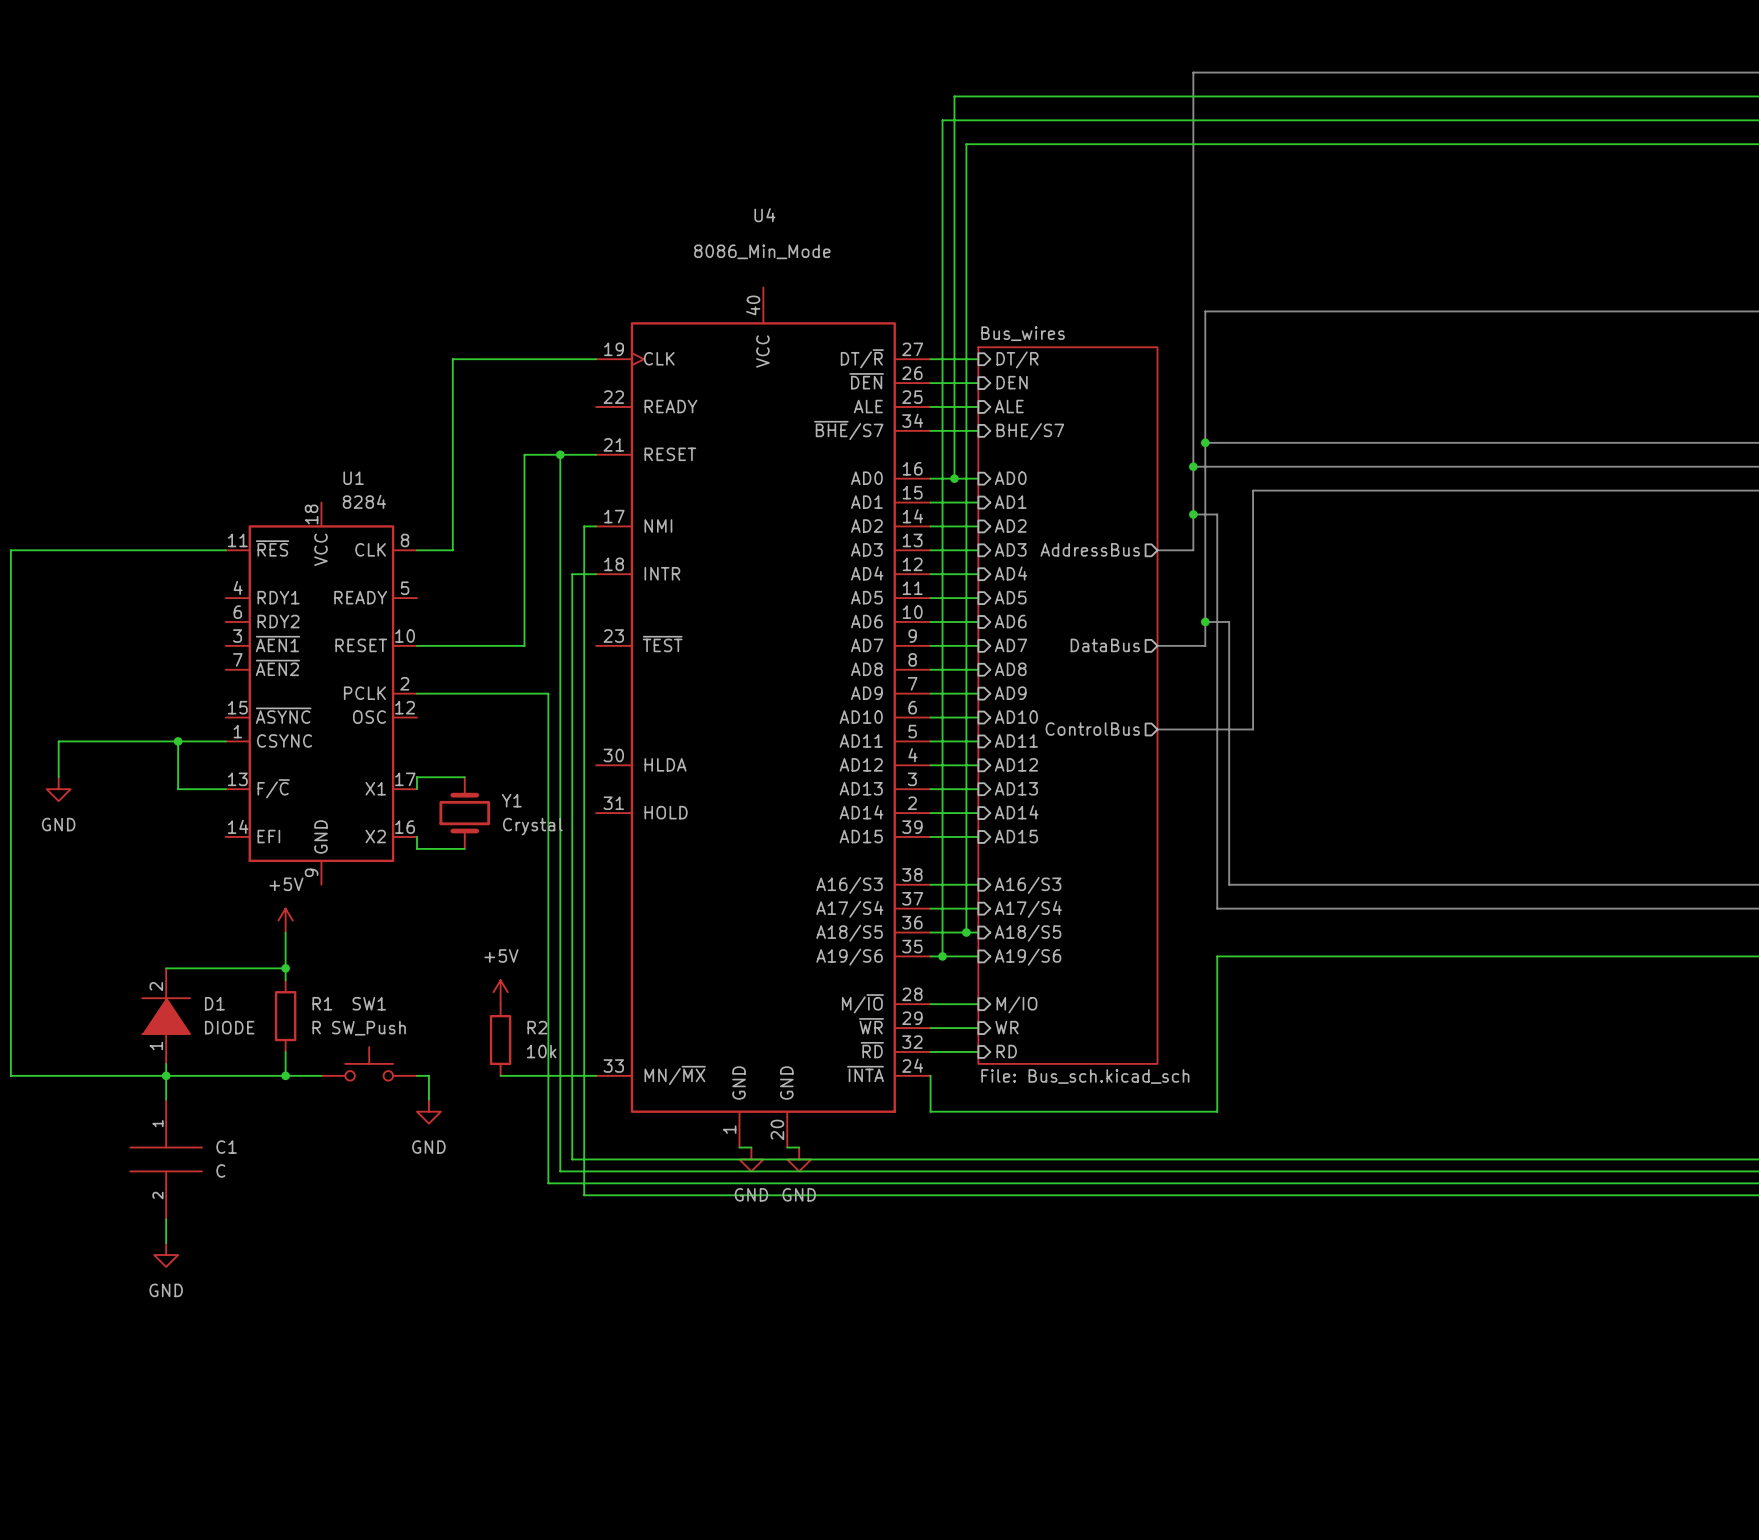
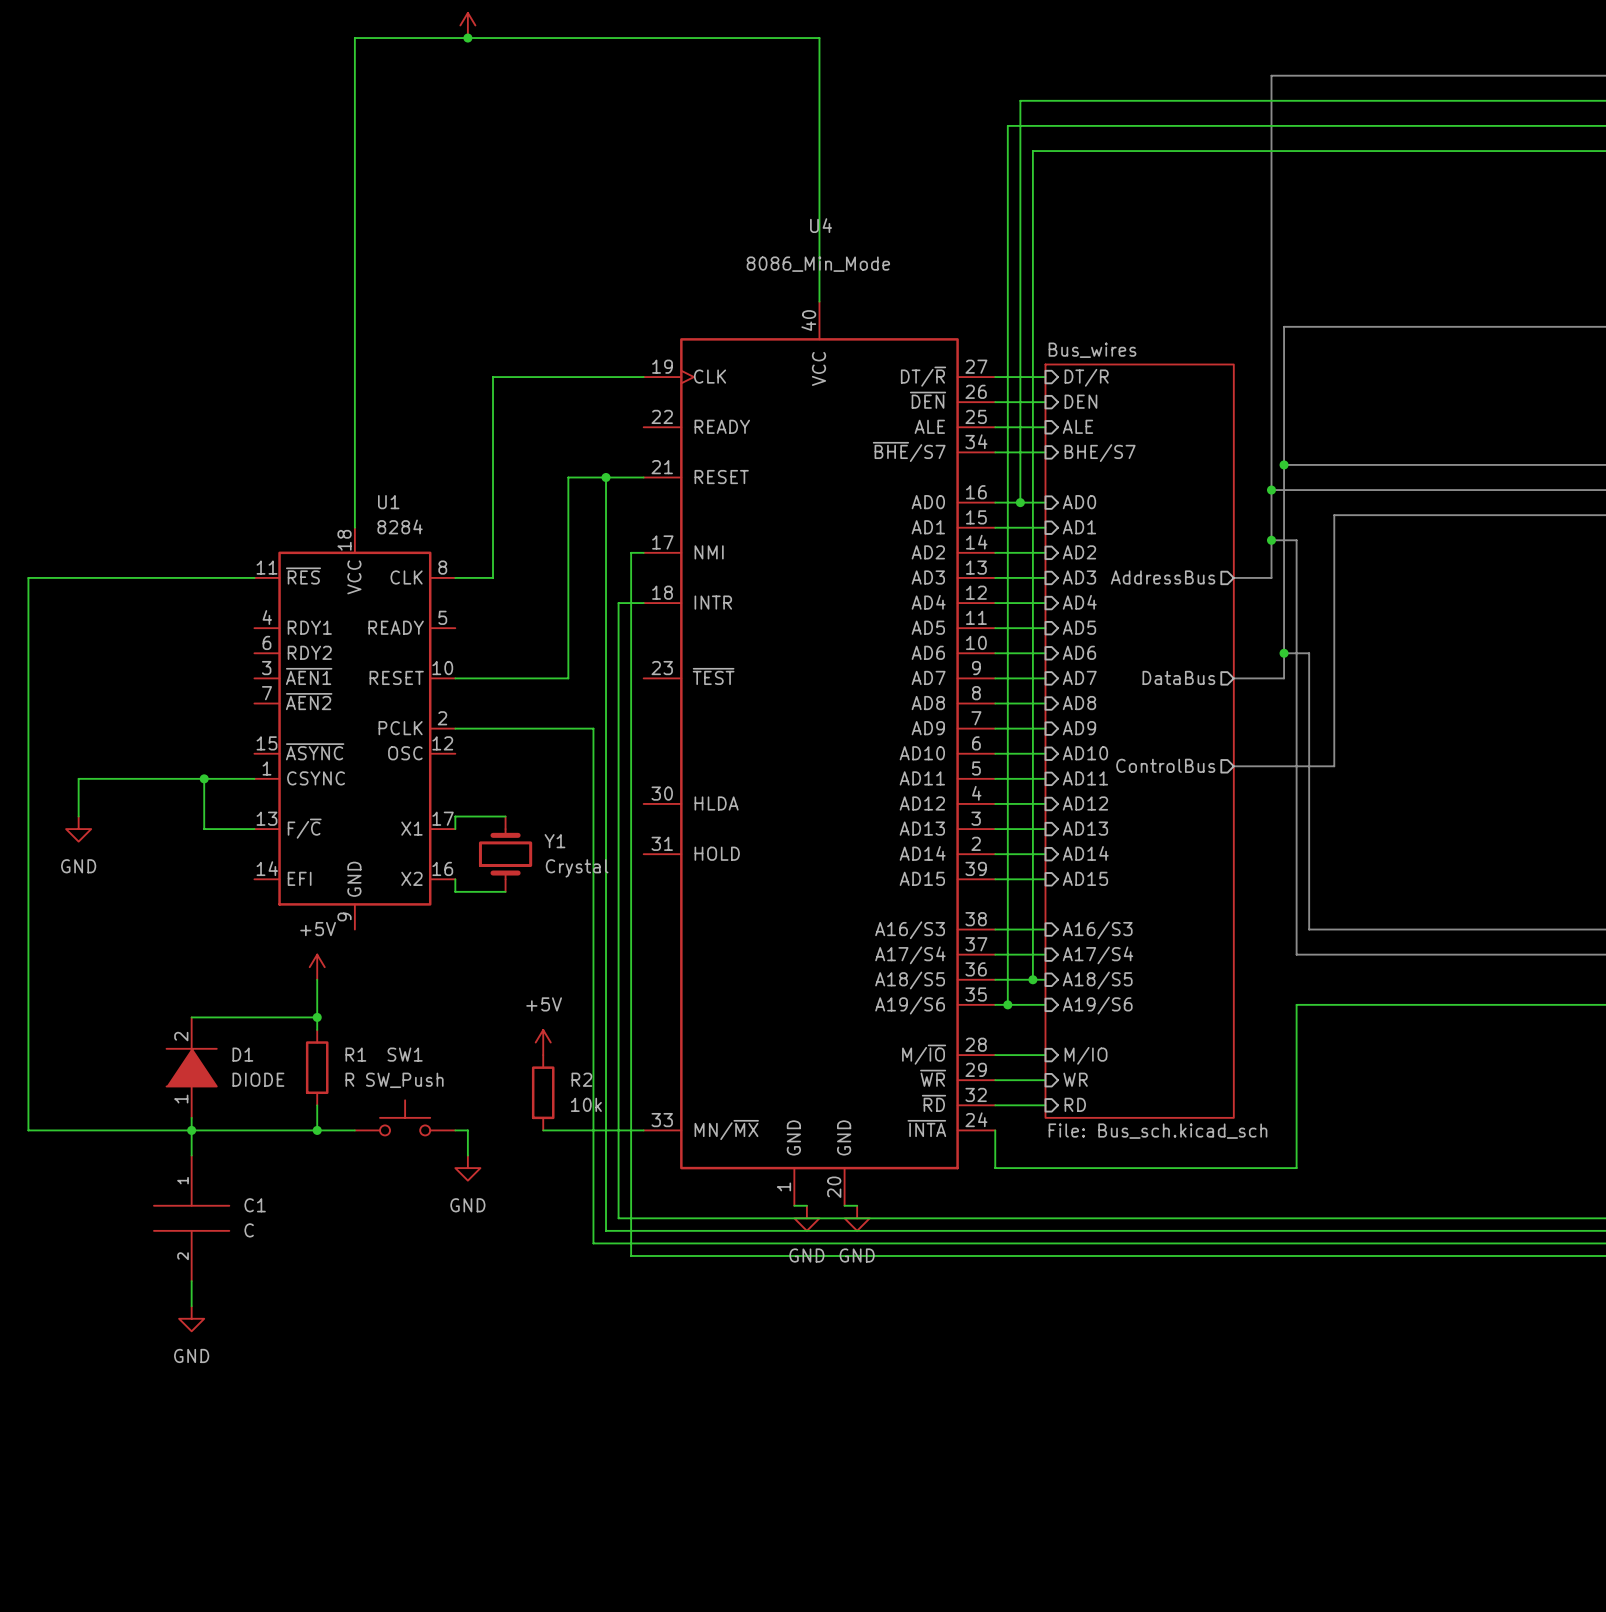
power symbol: none -> (467, 25)
junction: none -> (467, 38)
wire: none -> (819, 301) (819, 38) (354, 38) (354, 527)

